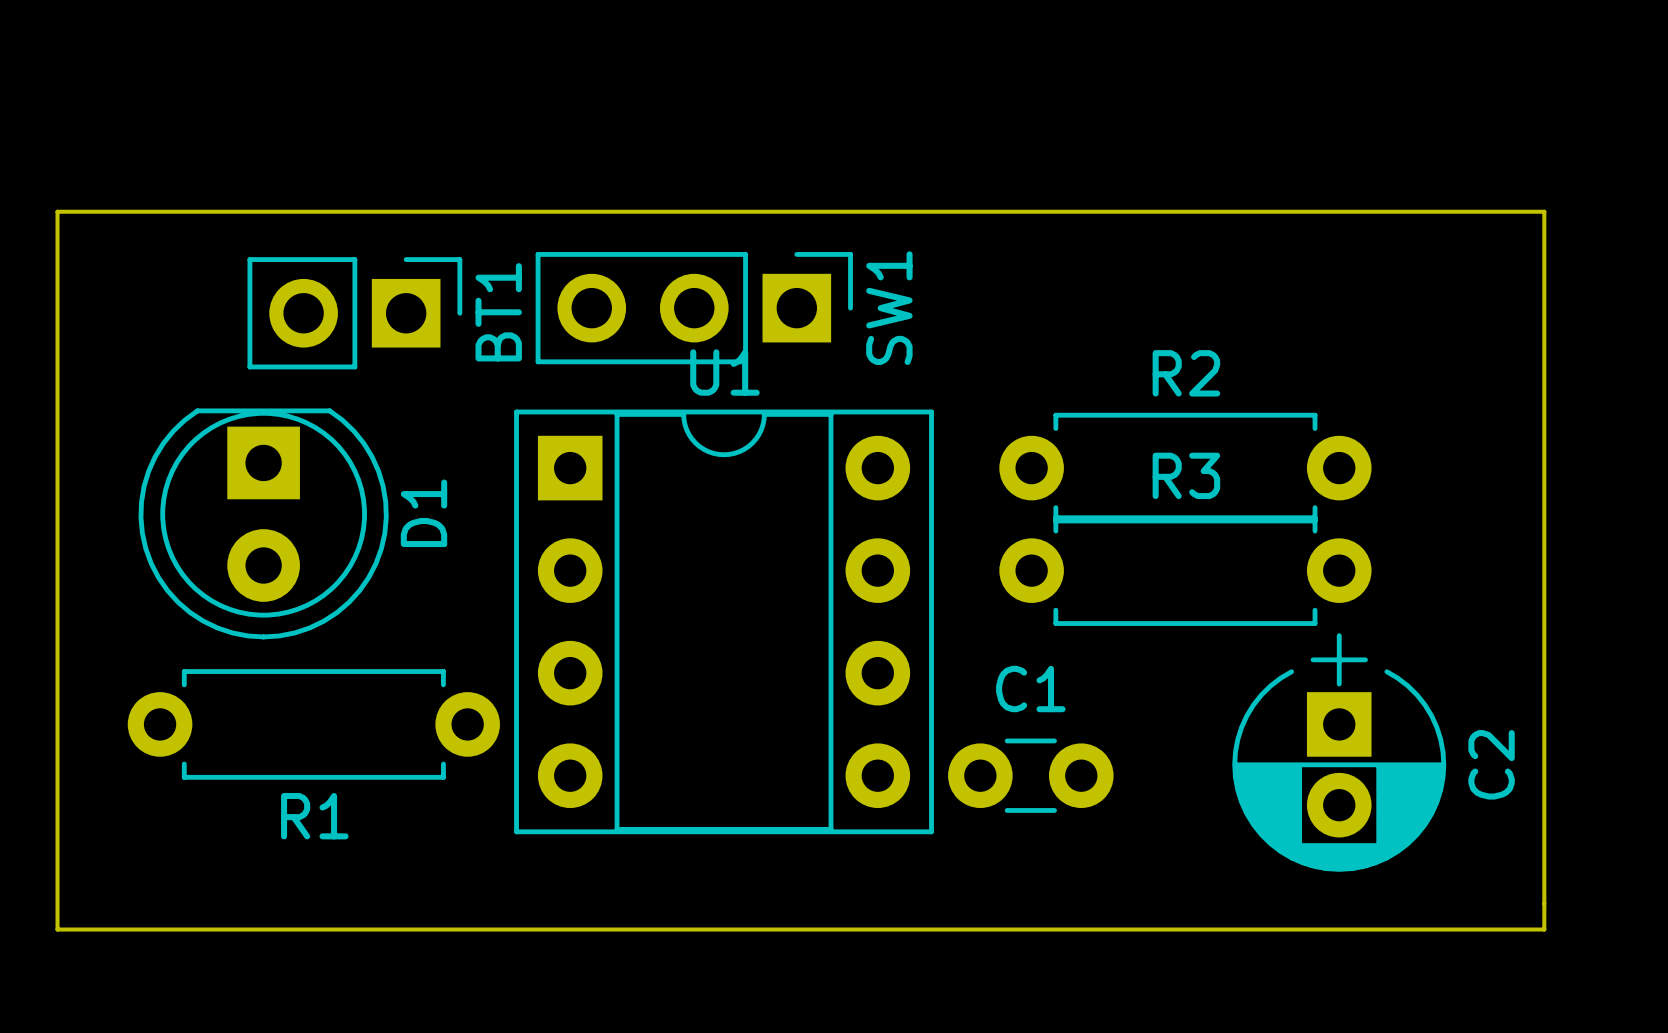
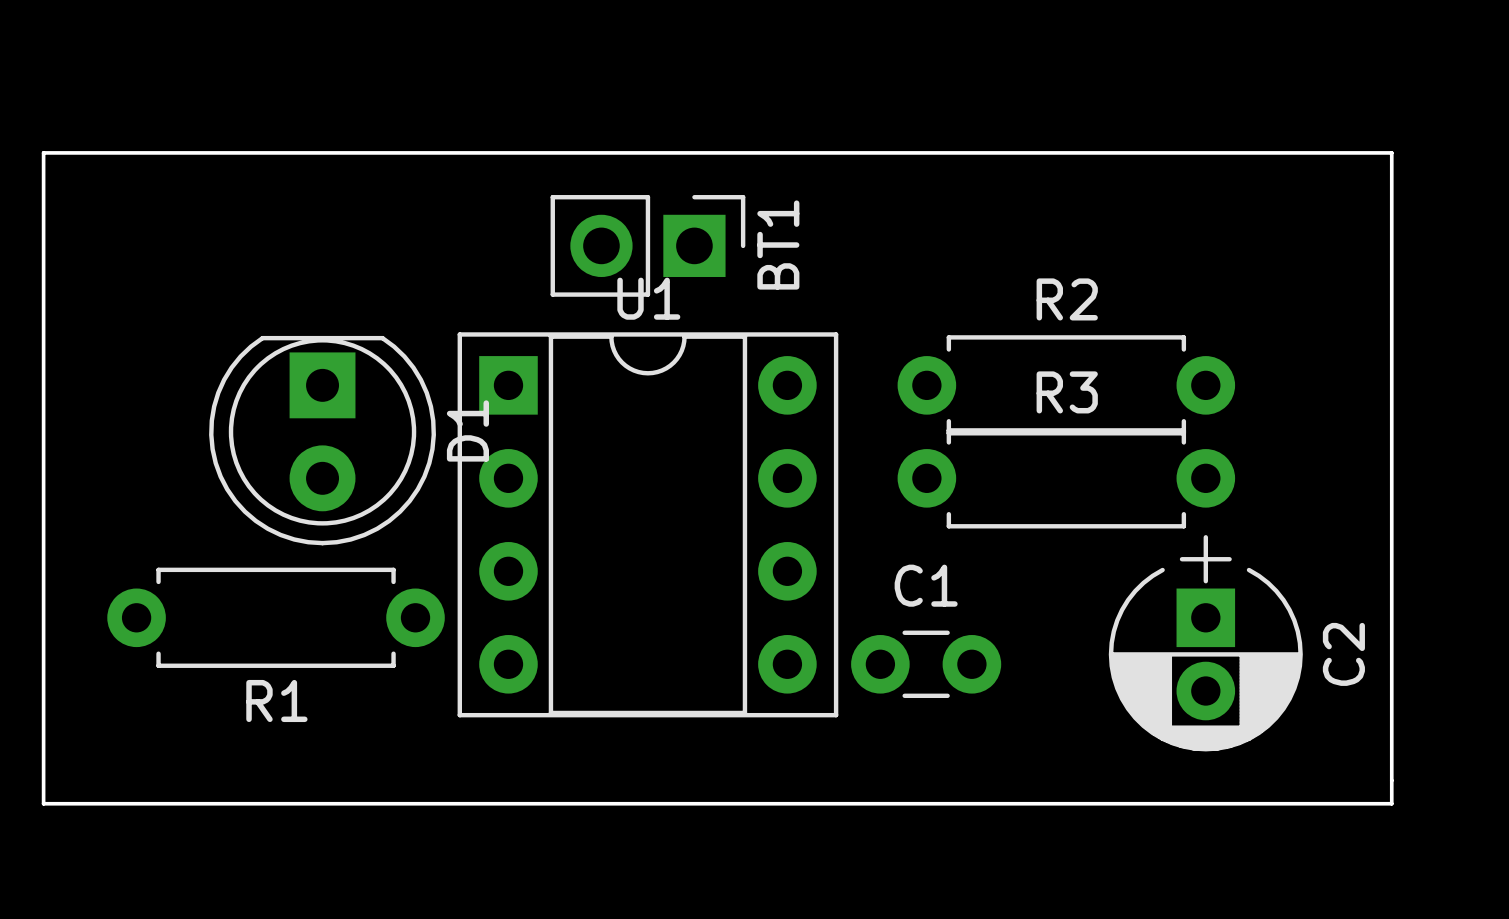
SW1: (694, 308) -> none
BT1 position: (354, 313) -> (647, 245)
D1 footprint: [138, 408, 389, 640] -> [209, 335, 436, 546]

